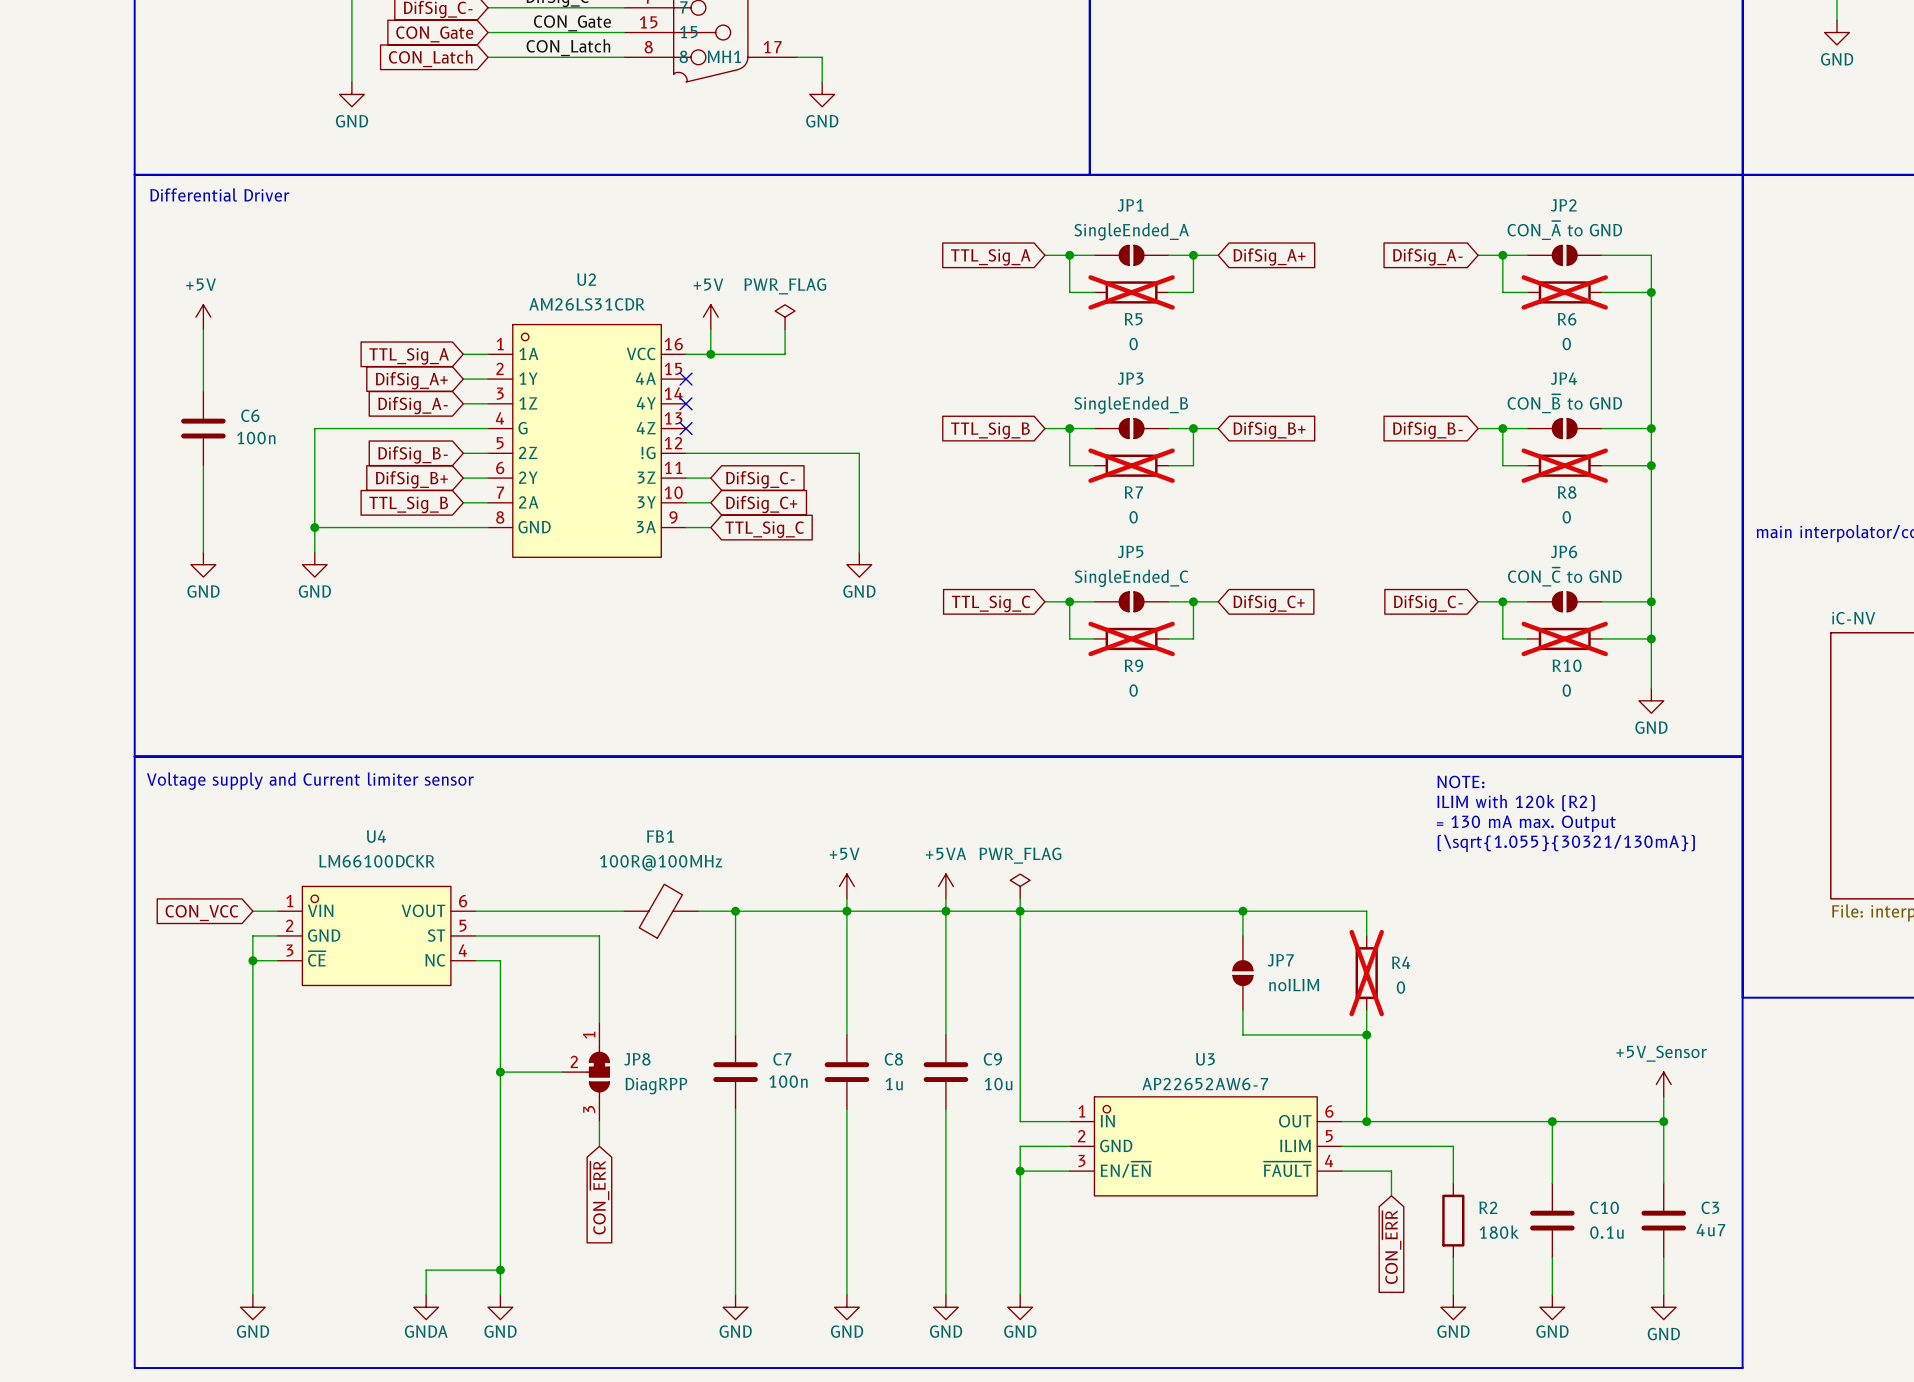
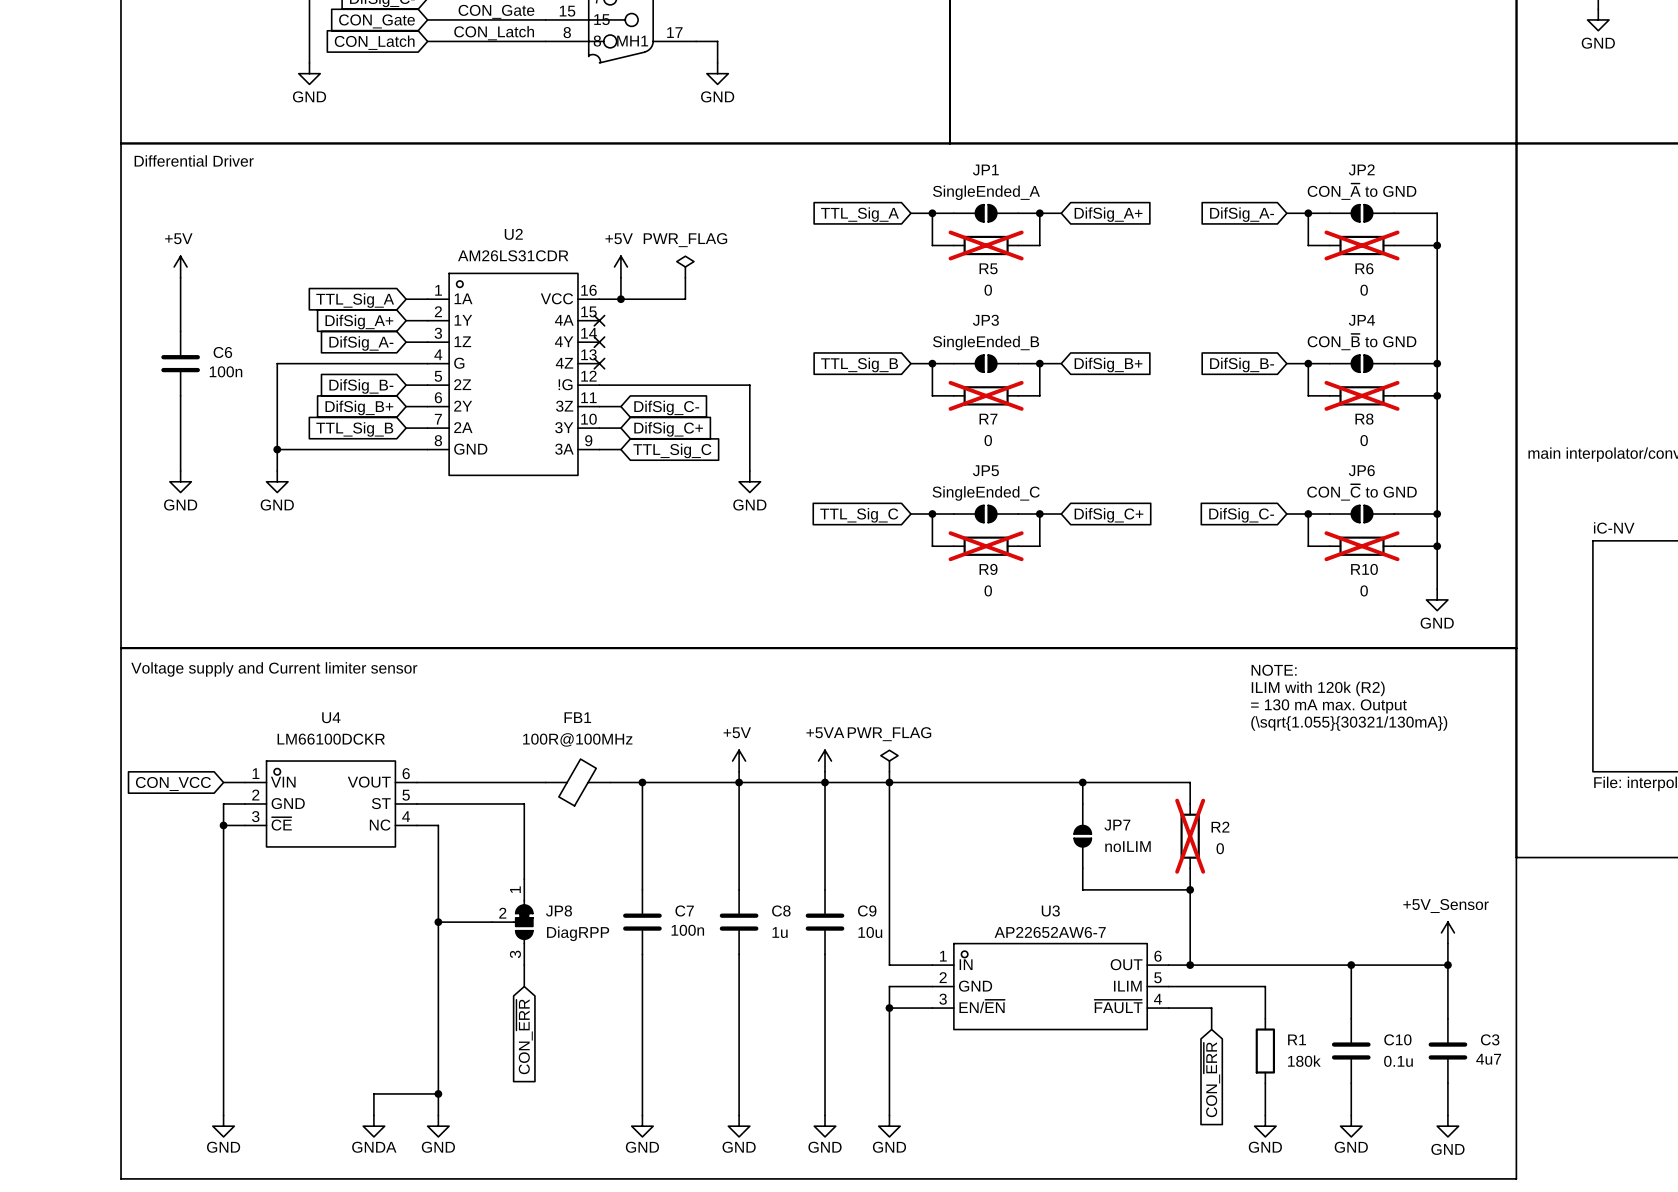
R4 name: R4 (1401, 962) -> R2 (1220, 827)
R2 name: R2 (1488, 1207) -> R1 (1297, 1039)

